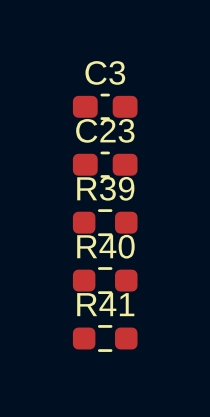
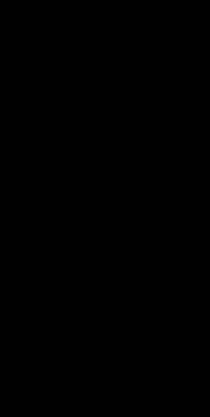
C3: (105, 106) -> none
C23: (105, 164) -> none
R39: (105, 222) -> none
R40: (105, 280) -> none
R41: (105, 338) -> none

